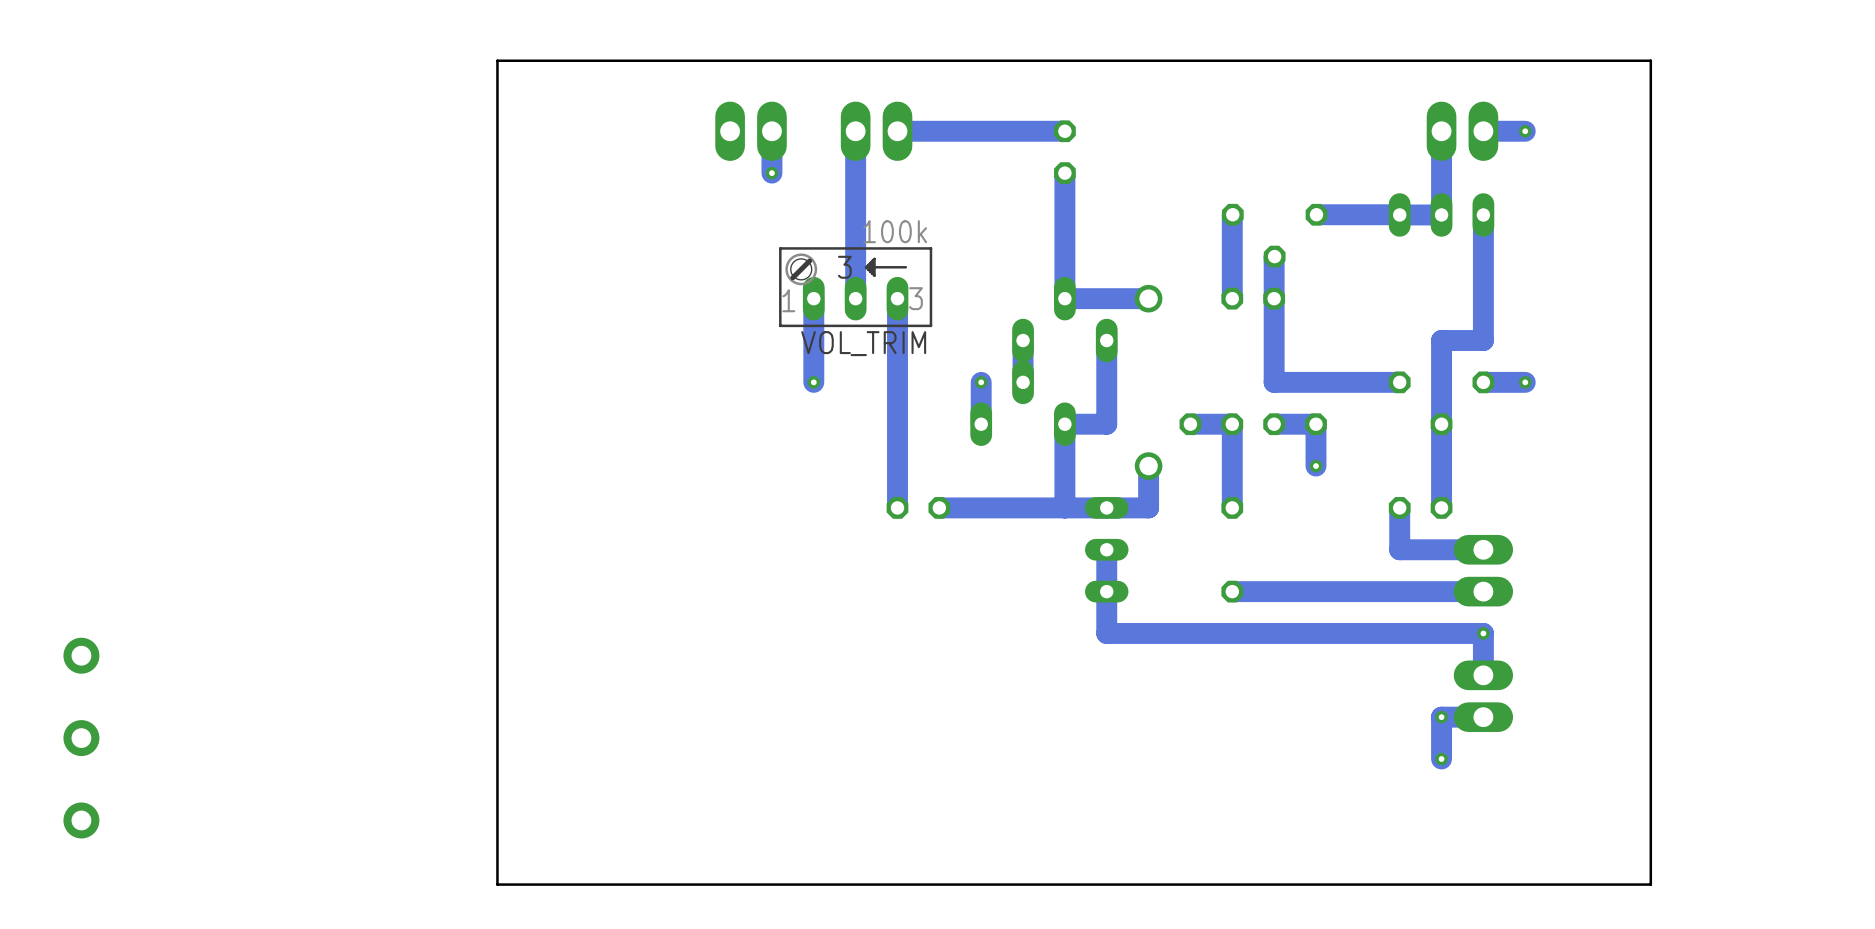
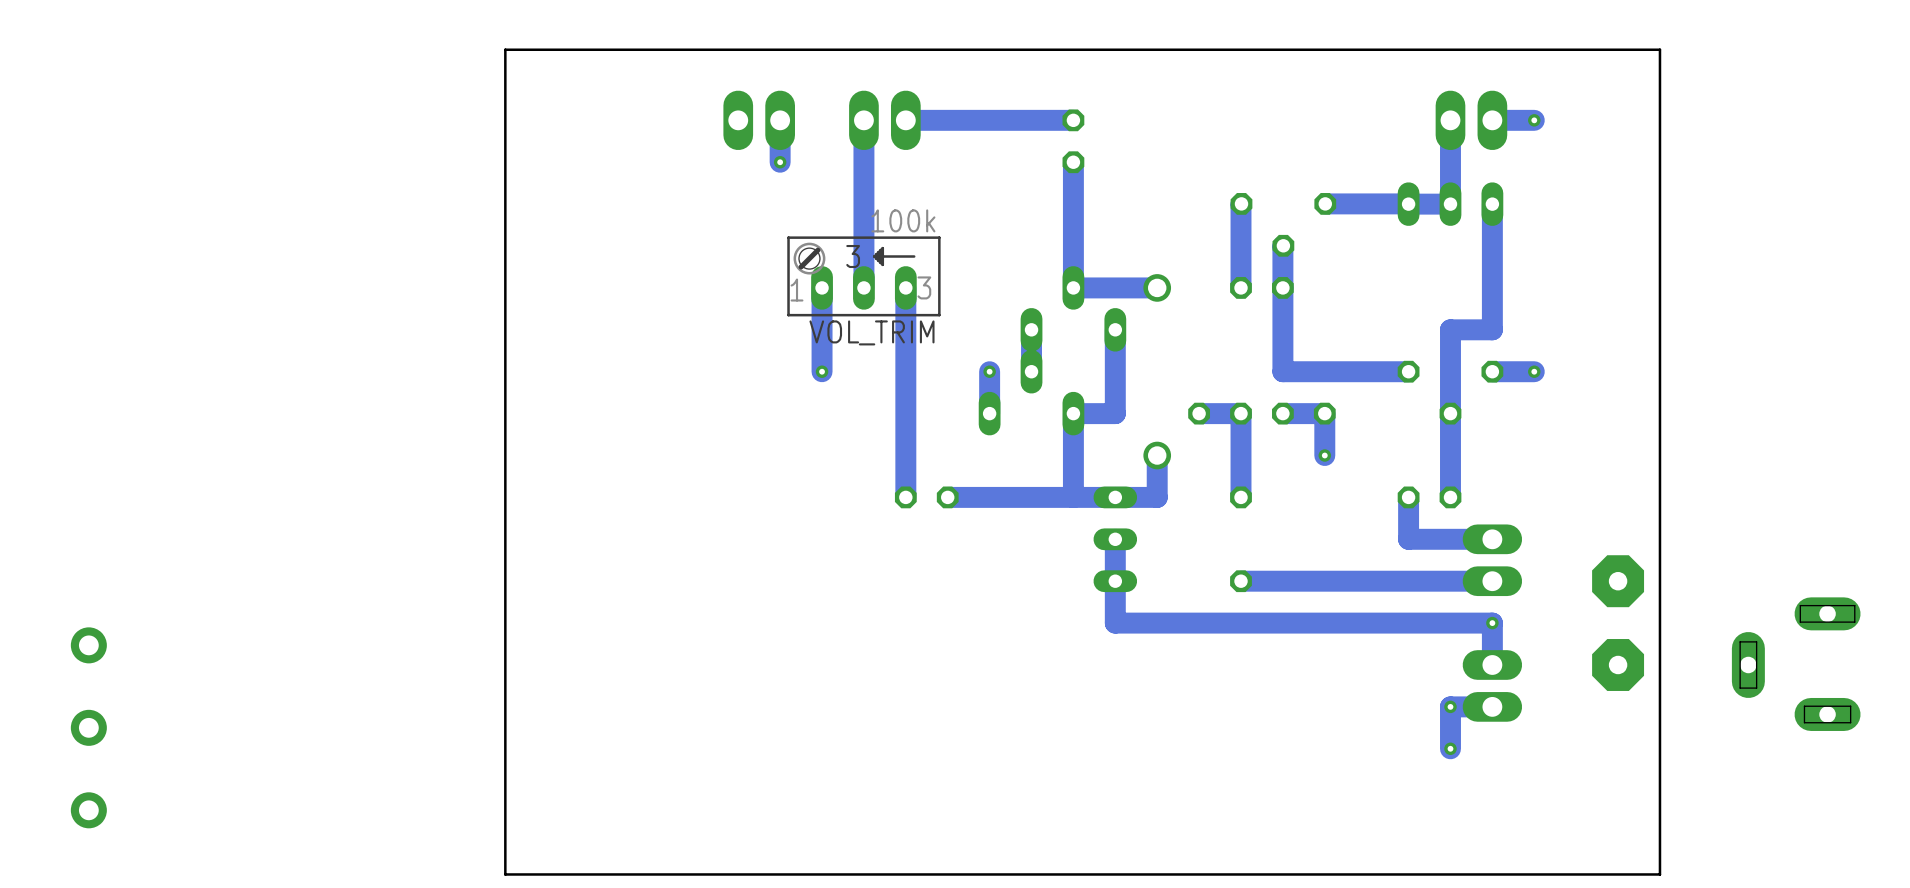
part: none -> (1618, 623)
part: none -> (1796, 664)

